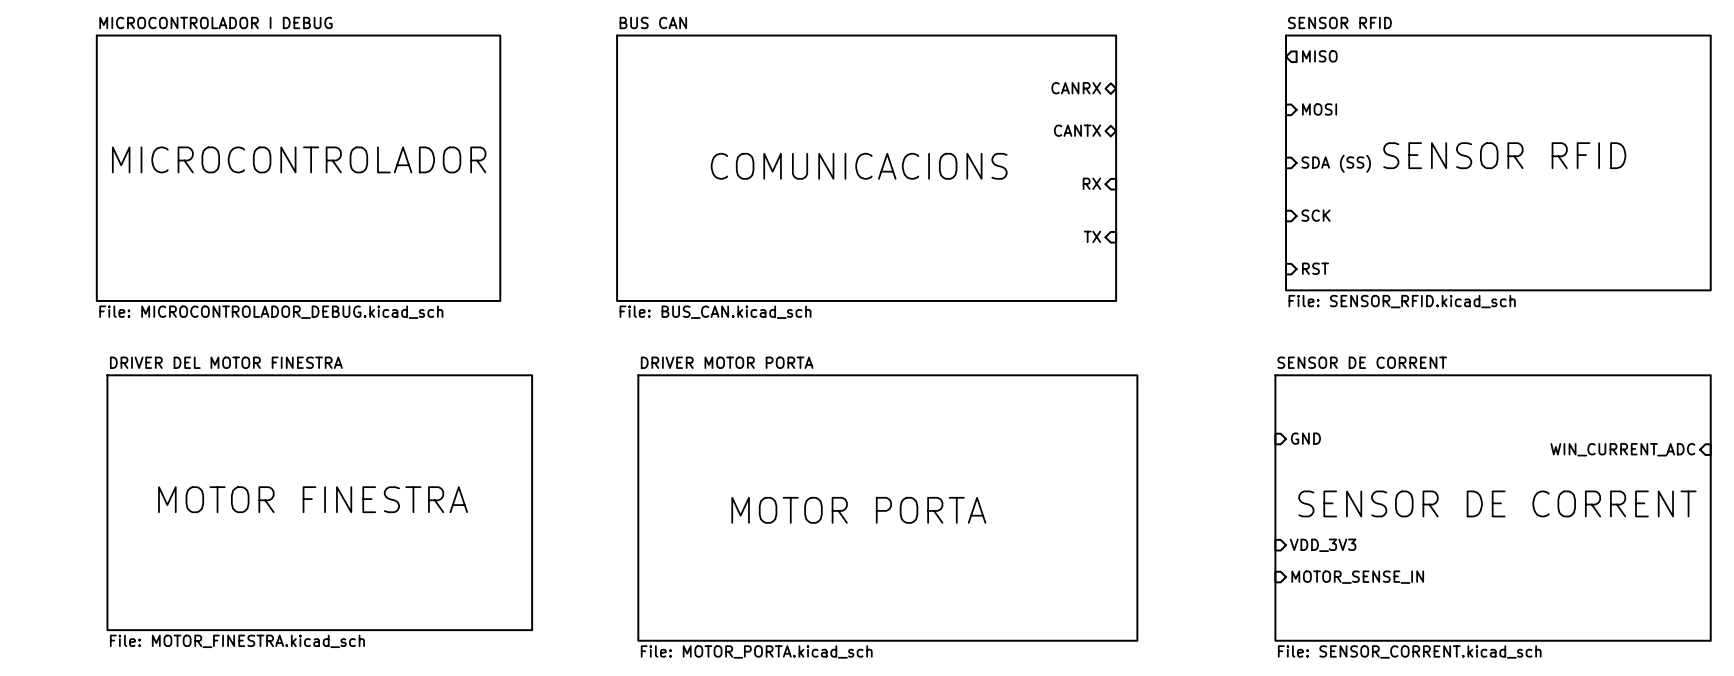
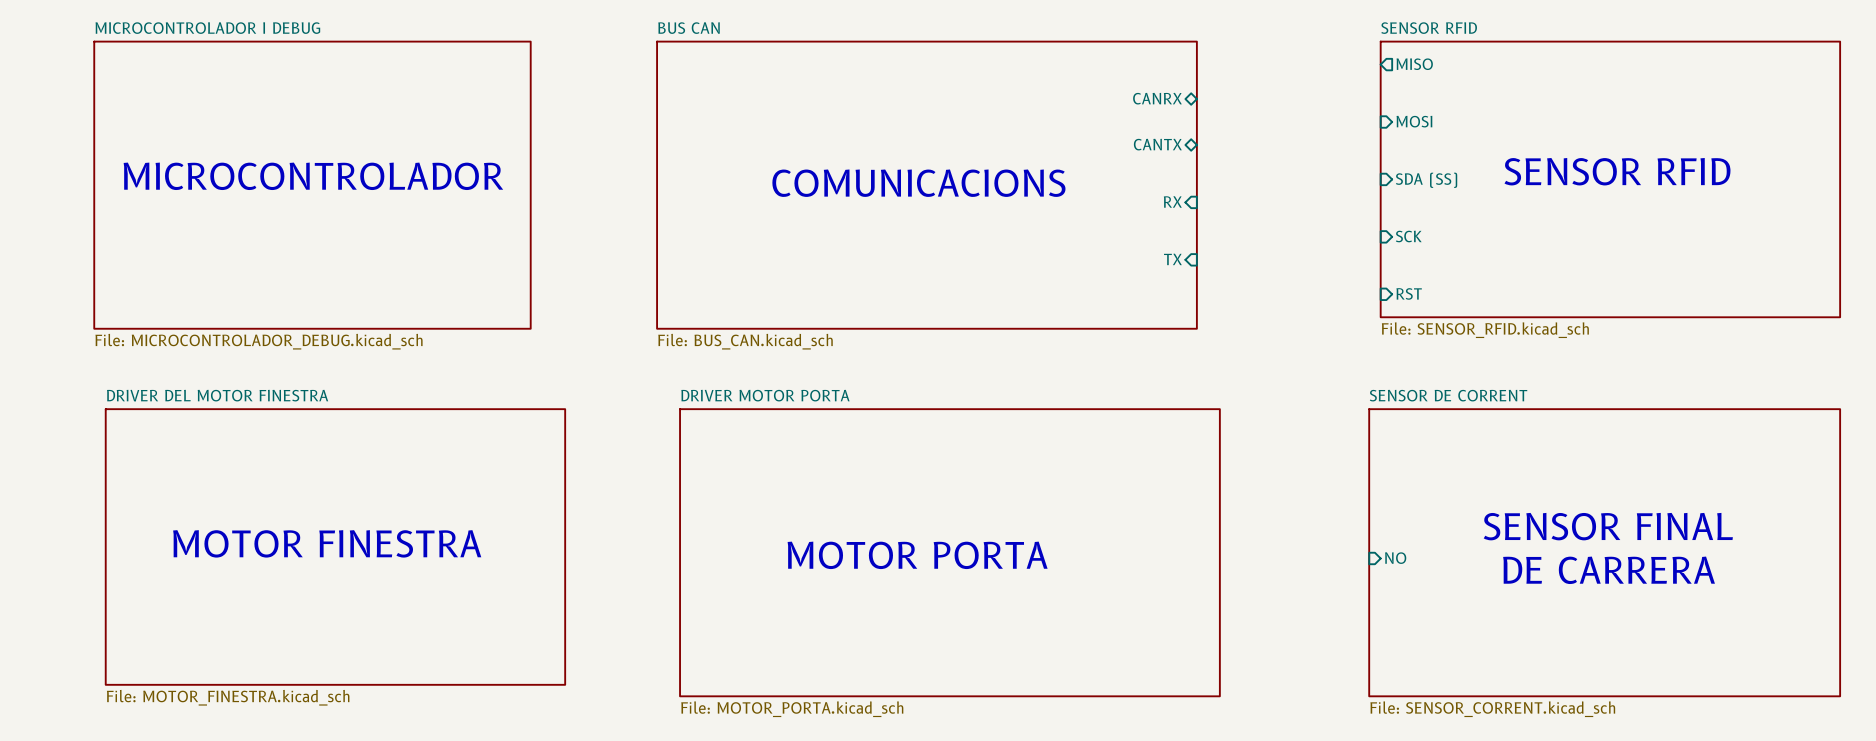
sheet pin: GND (1305, 438) -> none
sheet pin: WIN_CURRENT_ADC (1622, 449) -> none
text: none -> SENSOR FINAL (1608, 526)
text: SENSOR DE CORRENT (1497, 503) -> none
sheet pin: none -> NO (1395, 558)
text: none -> DE CARRERA (1609, 570)
sheet pin: VDD_3V3 (1323, 545) -> none
sheet pin: MOTOR_SENSE_IN (1357, 577) -> none

